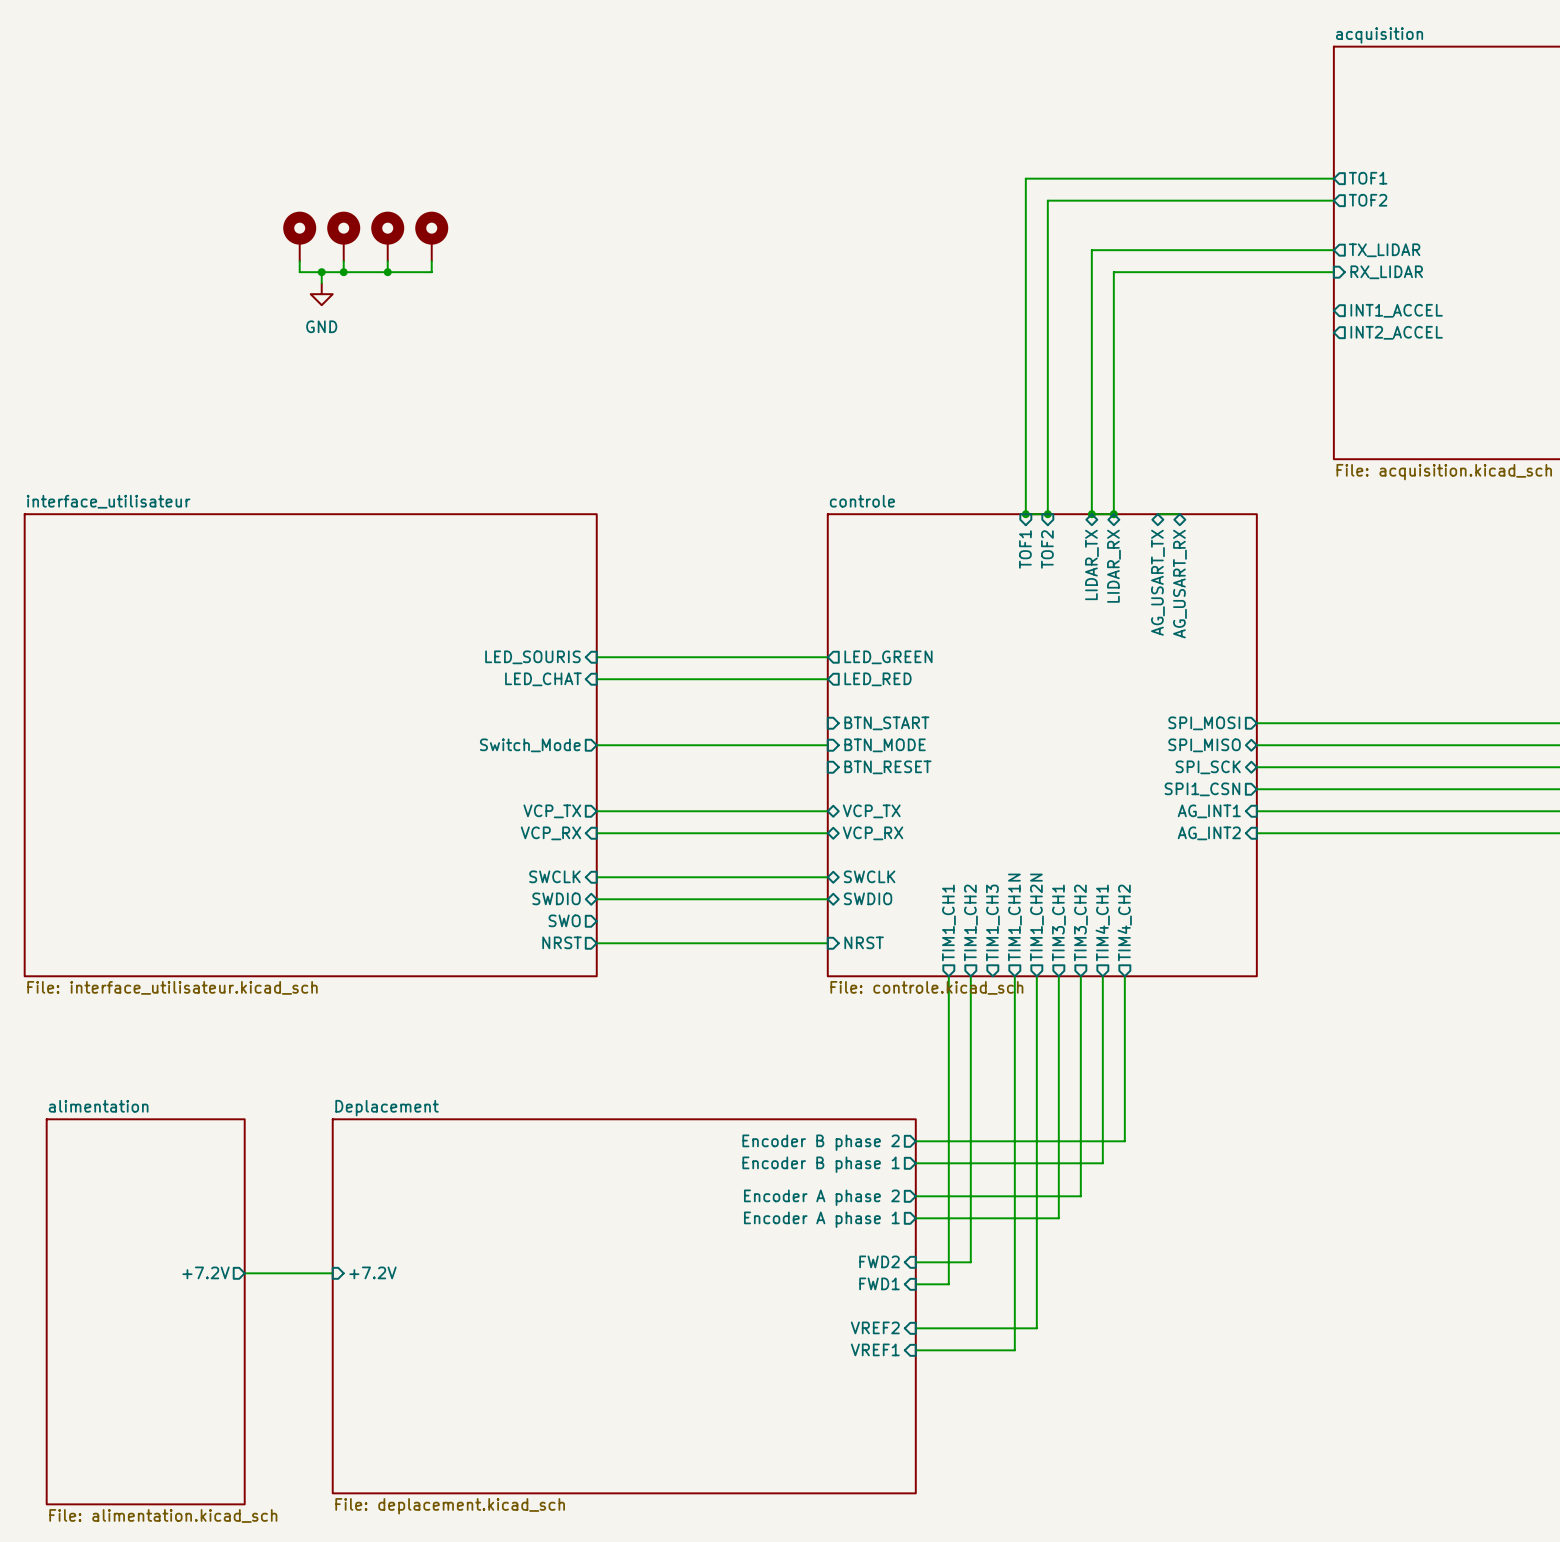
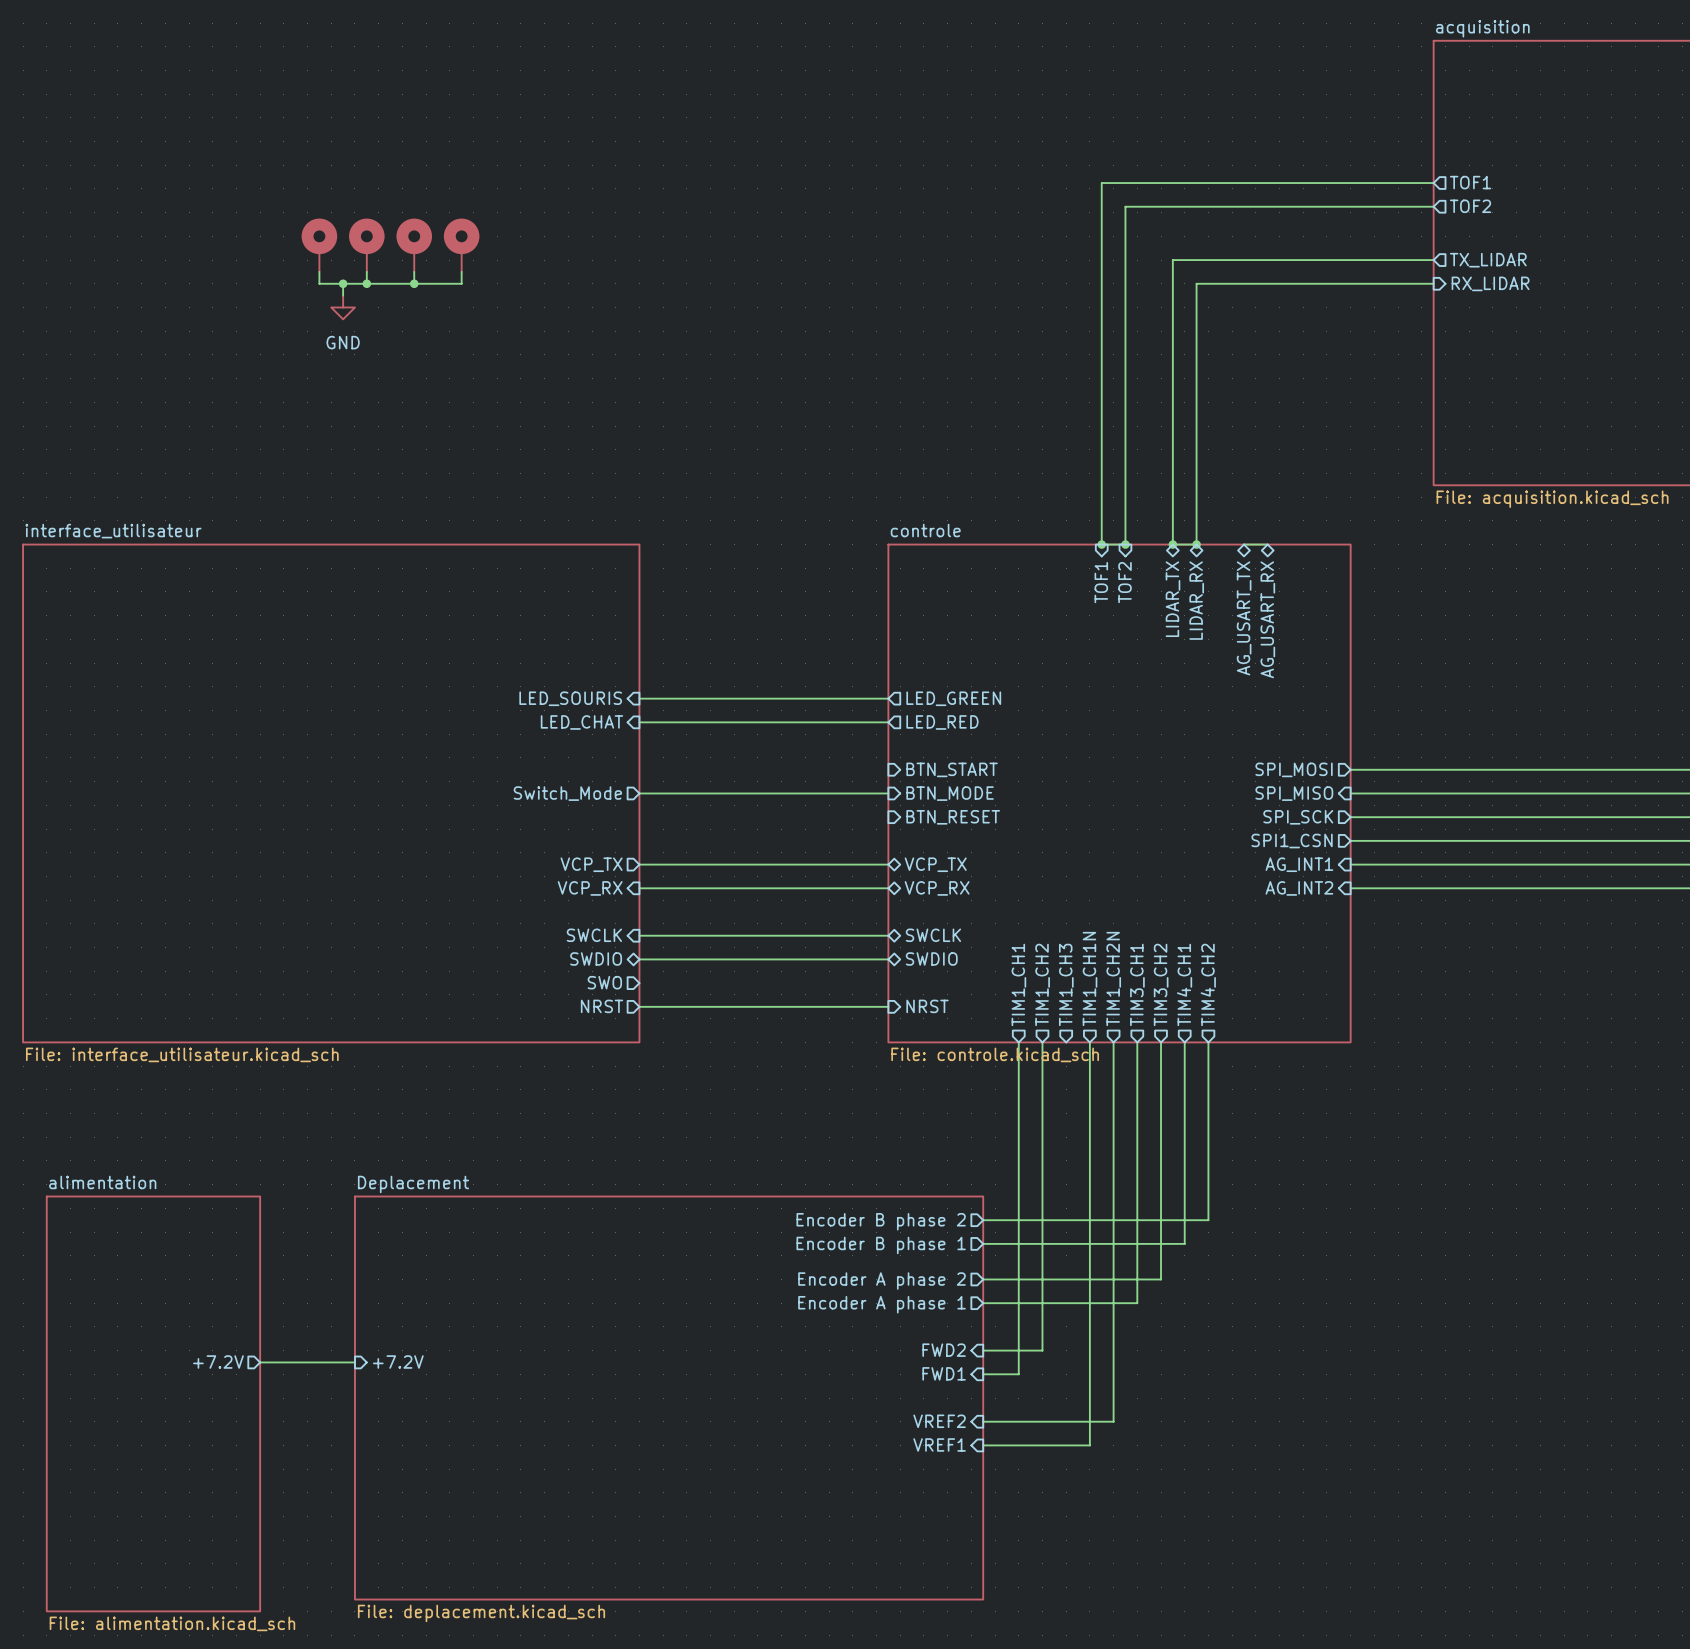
sheet pin: INT1_ACCEL (1396, 310) -> none
sheet pin: INT2_ACCEL (1396, 332) -> none
sheet pin shape: bidirectional (1204, 745) -> input (1294, 793)
sheet pin shape: bidirectional (1208, 767) -> output (1298, 817)

